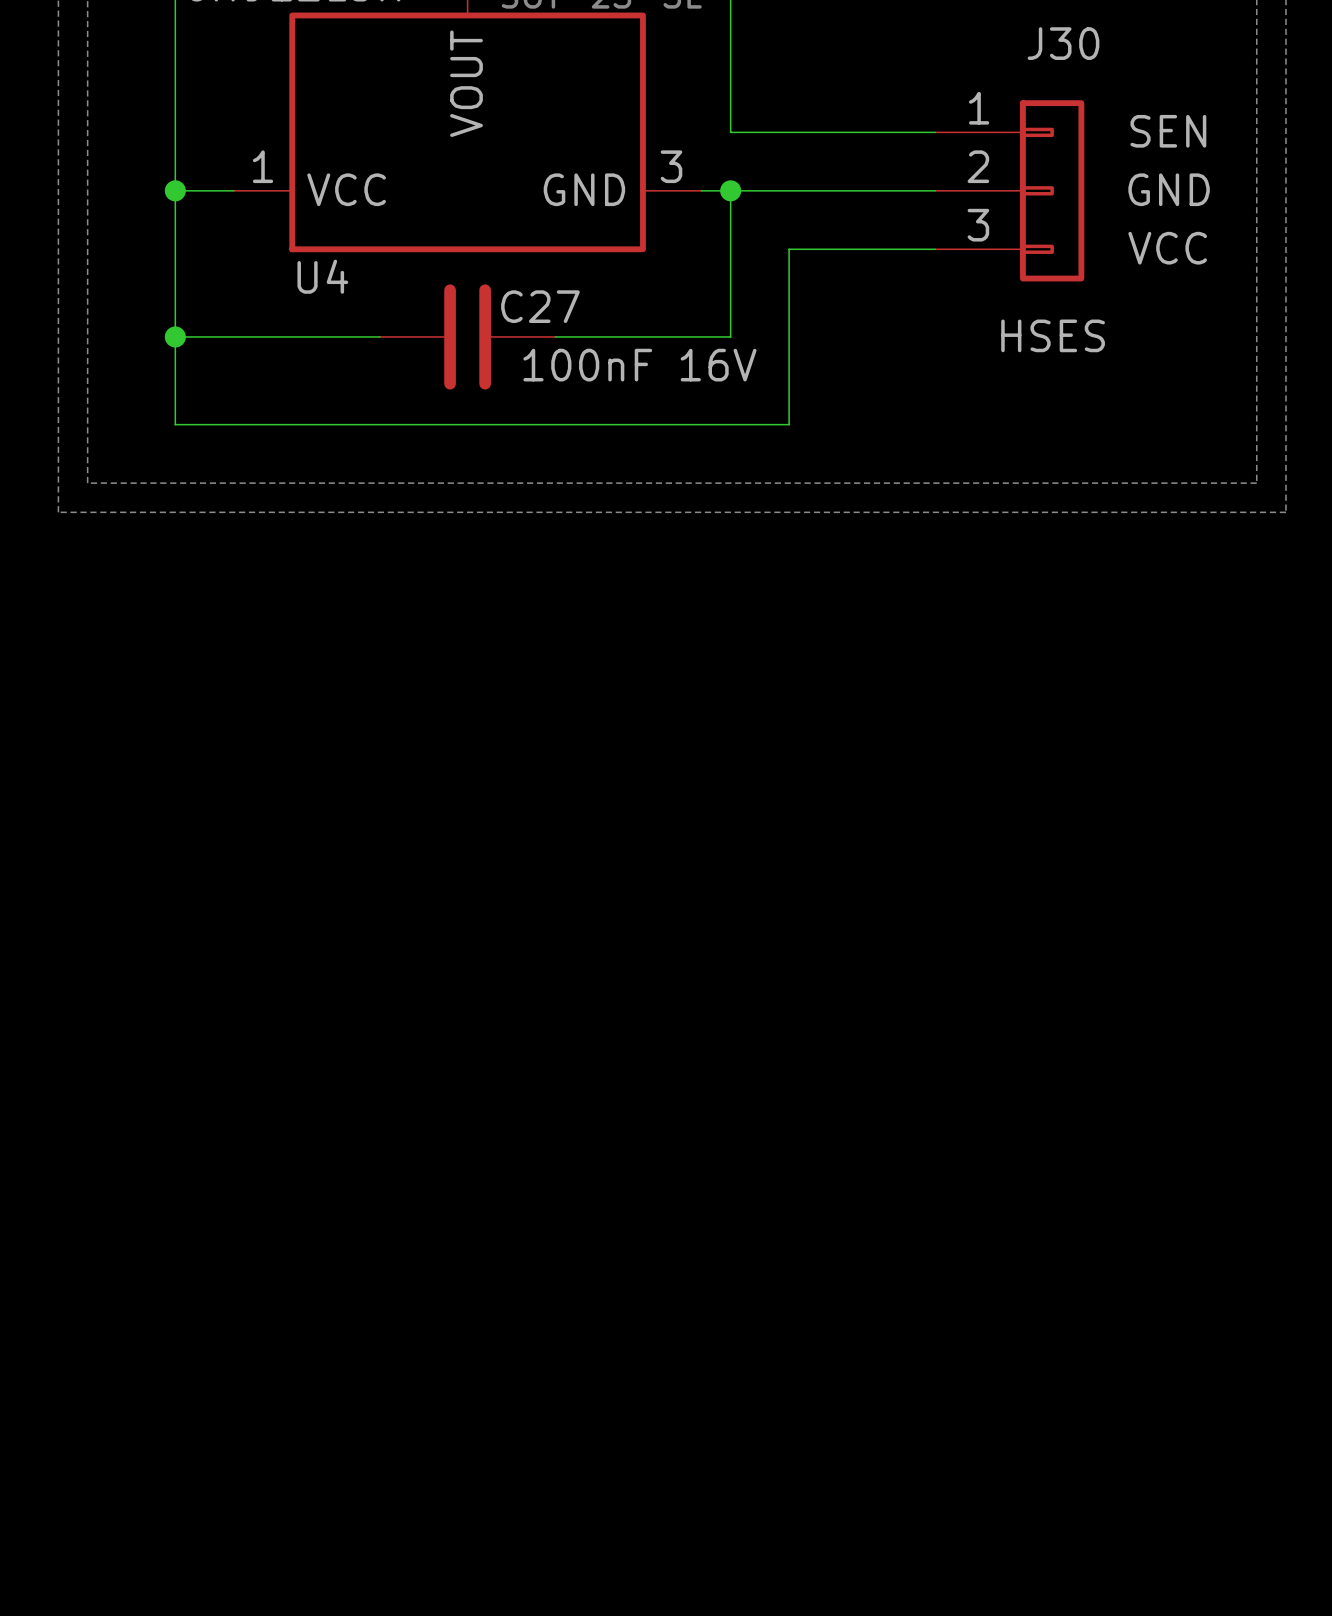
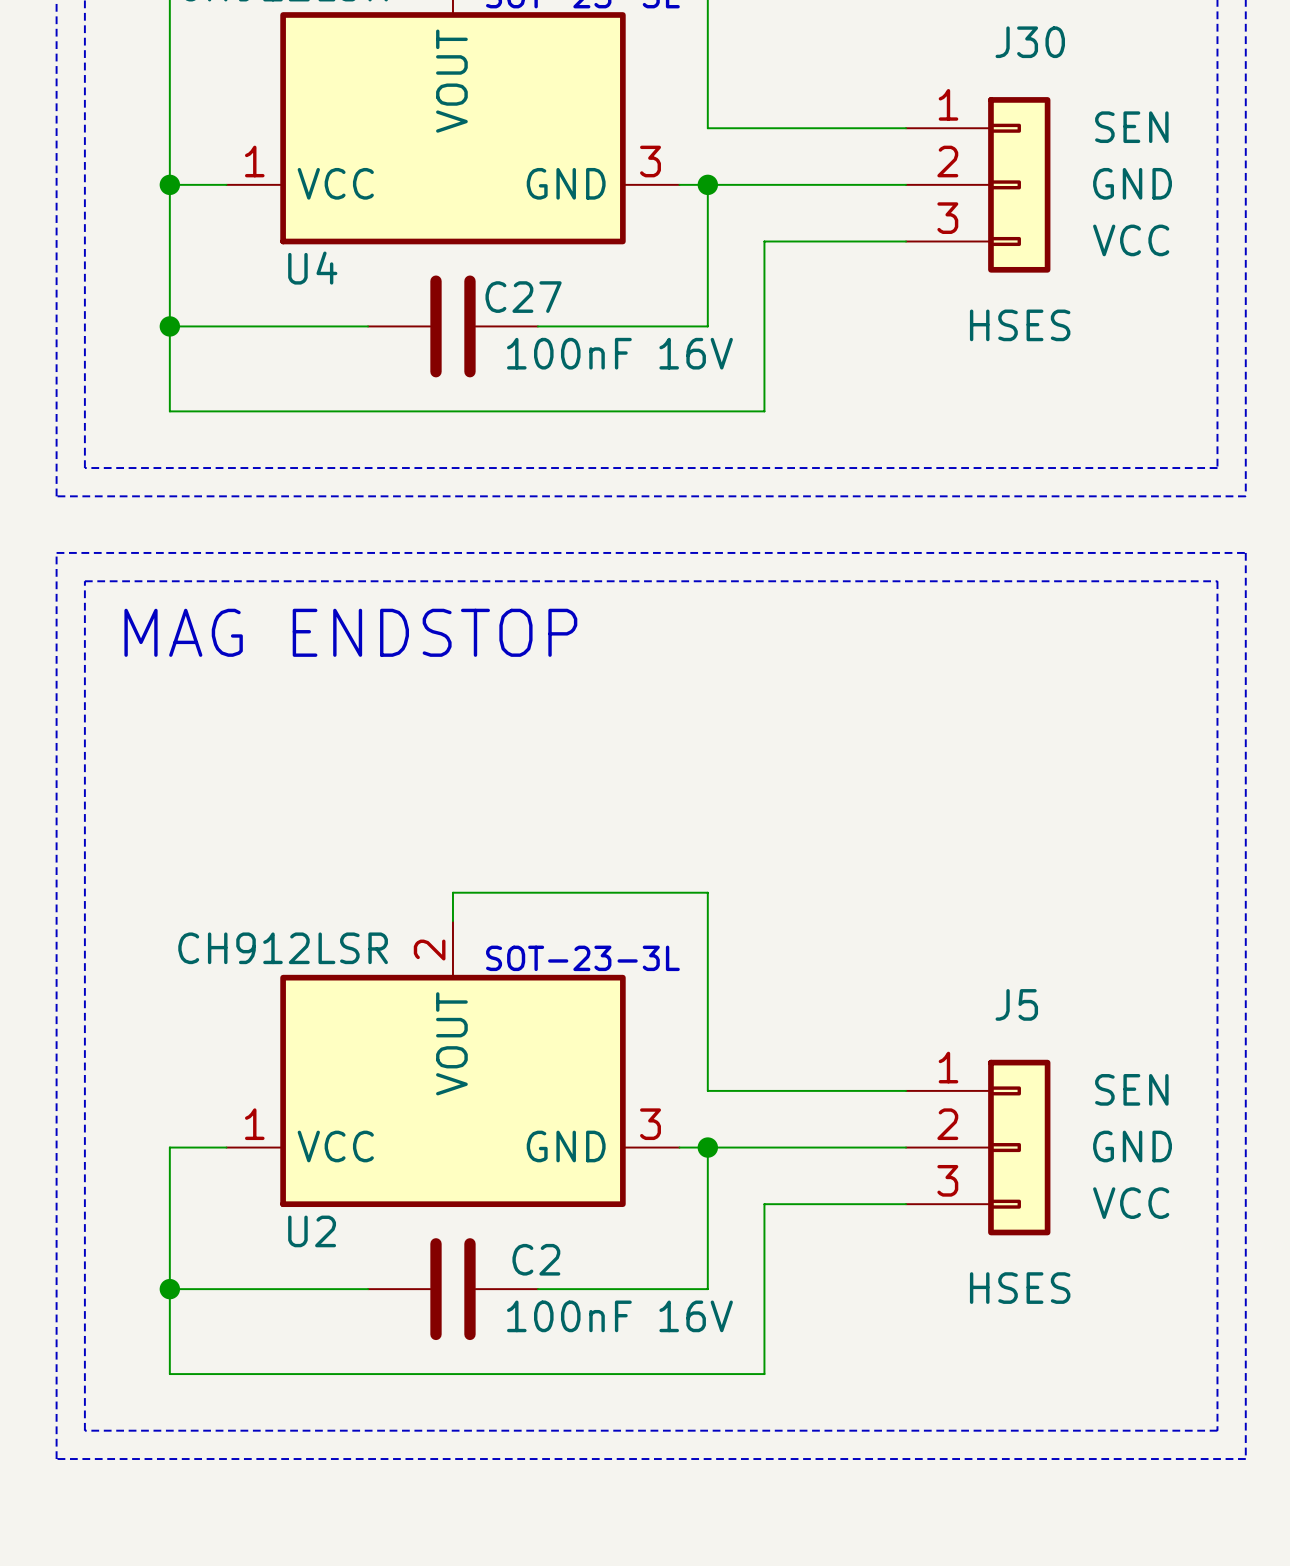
line: none -> (56, 552) (56, 1459) (1245, 1459) (1245, 552) (56, 552)
line: none -> (84, 581) (1217, 581) (1217, 1430) (84, 1430) (84, 581)
text: none -> MAG ENDSTOP (350, 632)
wire: none -> (452, 921) (452, 892) (707, 892) (707, 1090) (906, 1090)
text: none -> SOT-23-3L (582, 958)
U2: none -> CH912LSR (452, 1064)
wire: none -> (226, 1147) (169, 1147) (169, 1374) (764, 1374) (764, 1204) (906, 1204)
wire: none -> (679, 1147) (906, 1147)
wire: none -> (707, 1147) (707, 1289) (537, 1289)
junction: none -> (707, 1147)
J5: none -> HSES (978, 1147)
wire: none -> (169, 1289) (368, 1289)
junction: none -> (169, 1289)
C2: none -> 100nF 16V (452, 1289)

